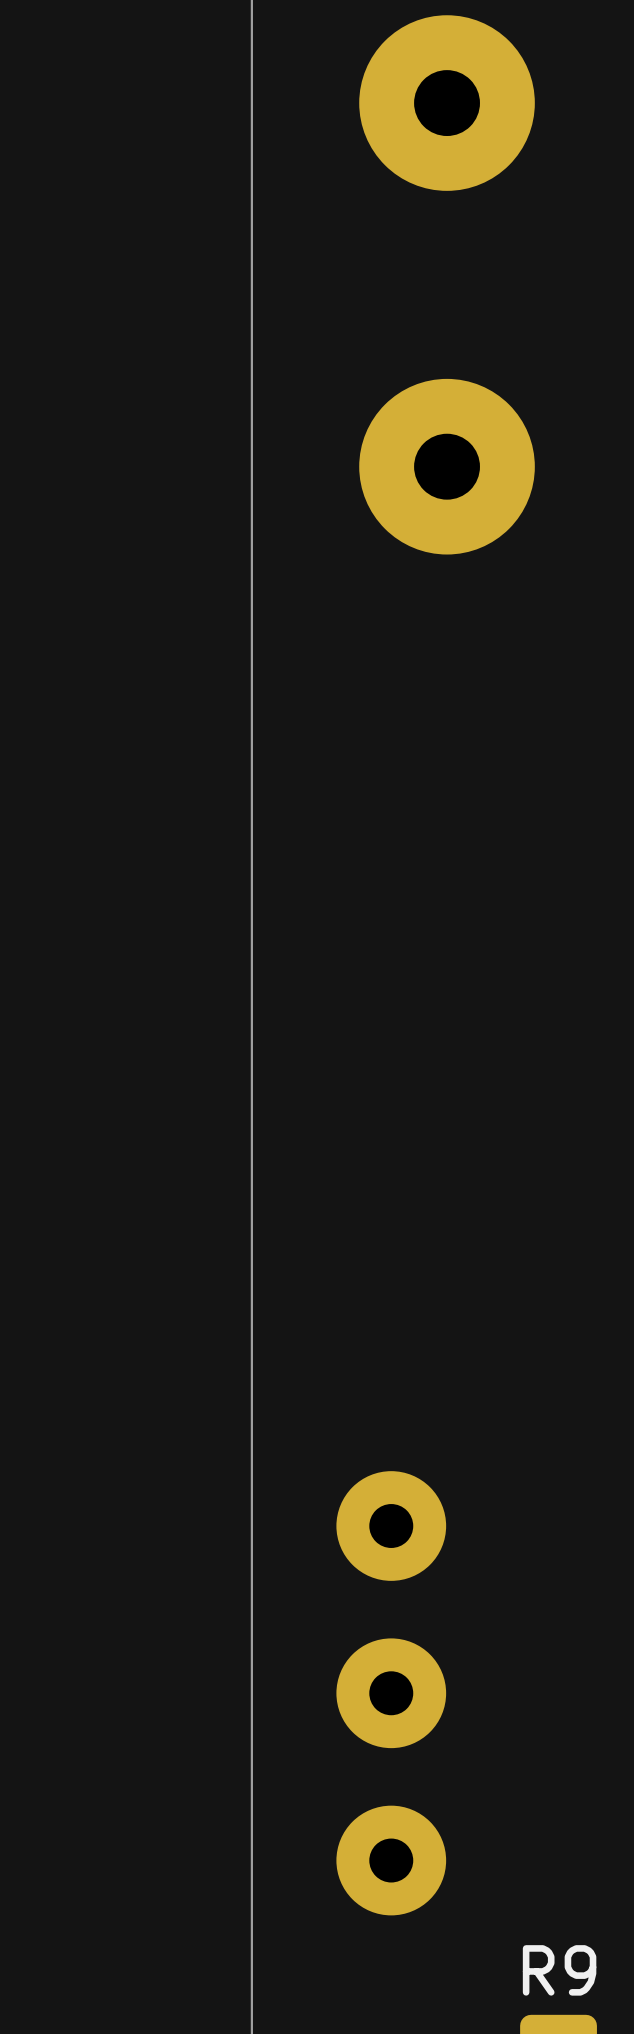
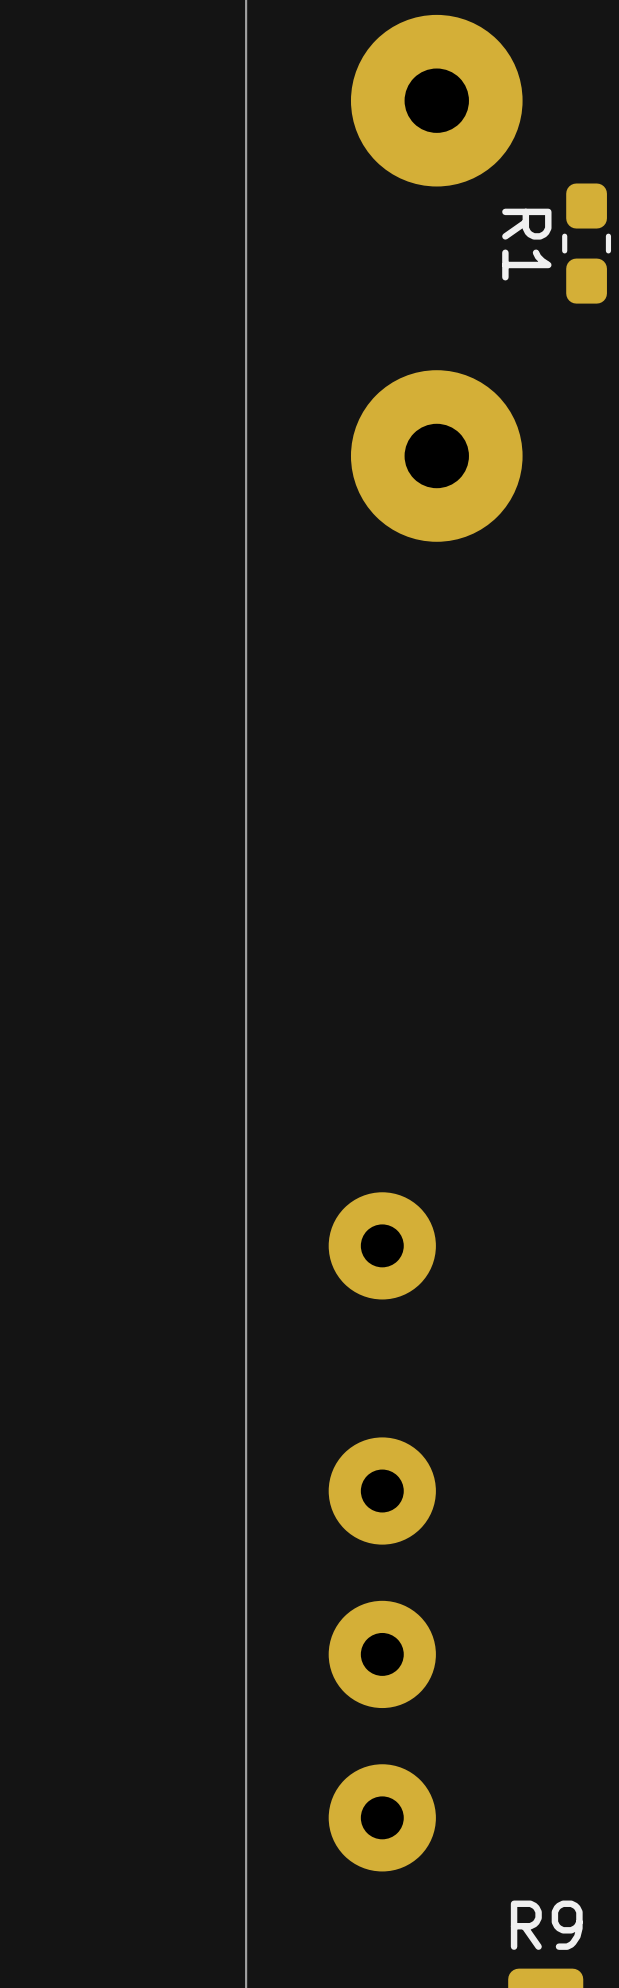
R1: none -> (586, 243)
part: none -> (382, 1245)

